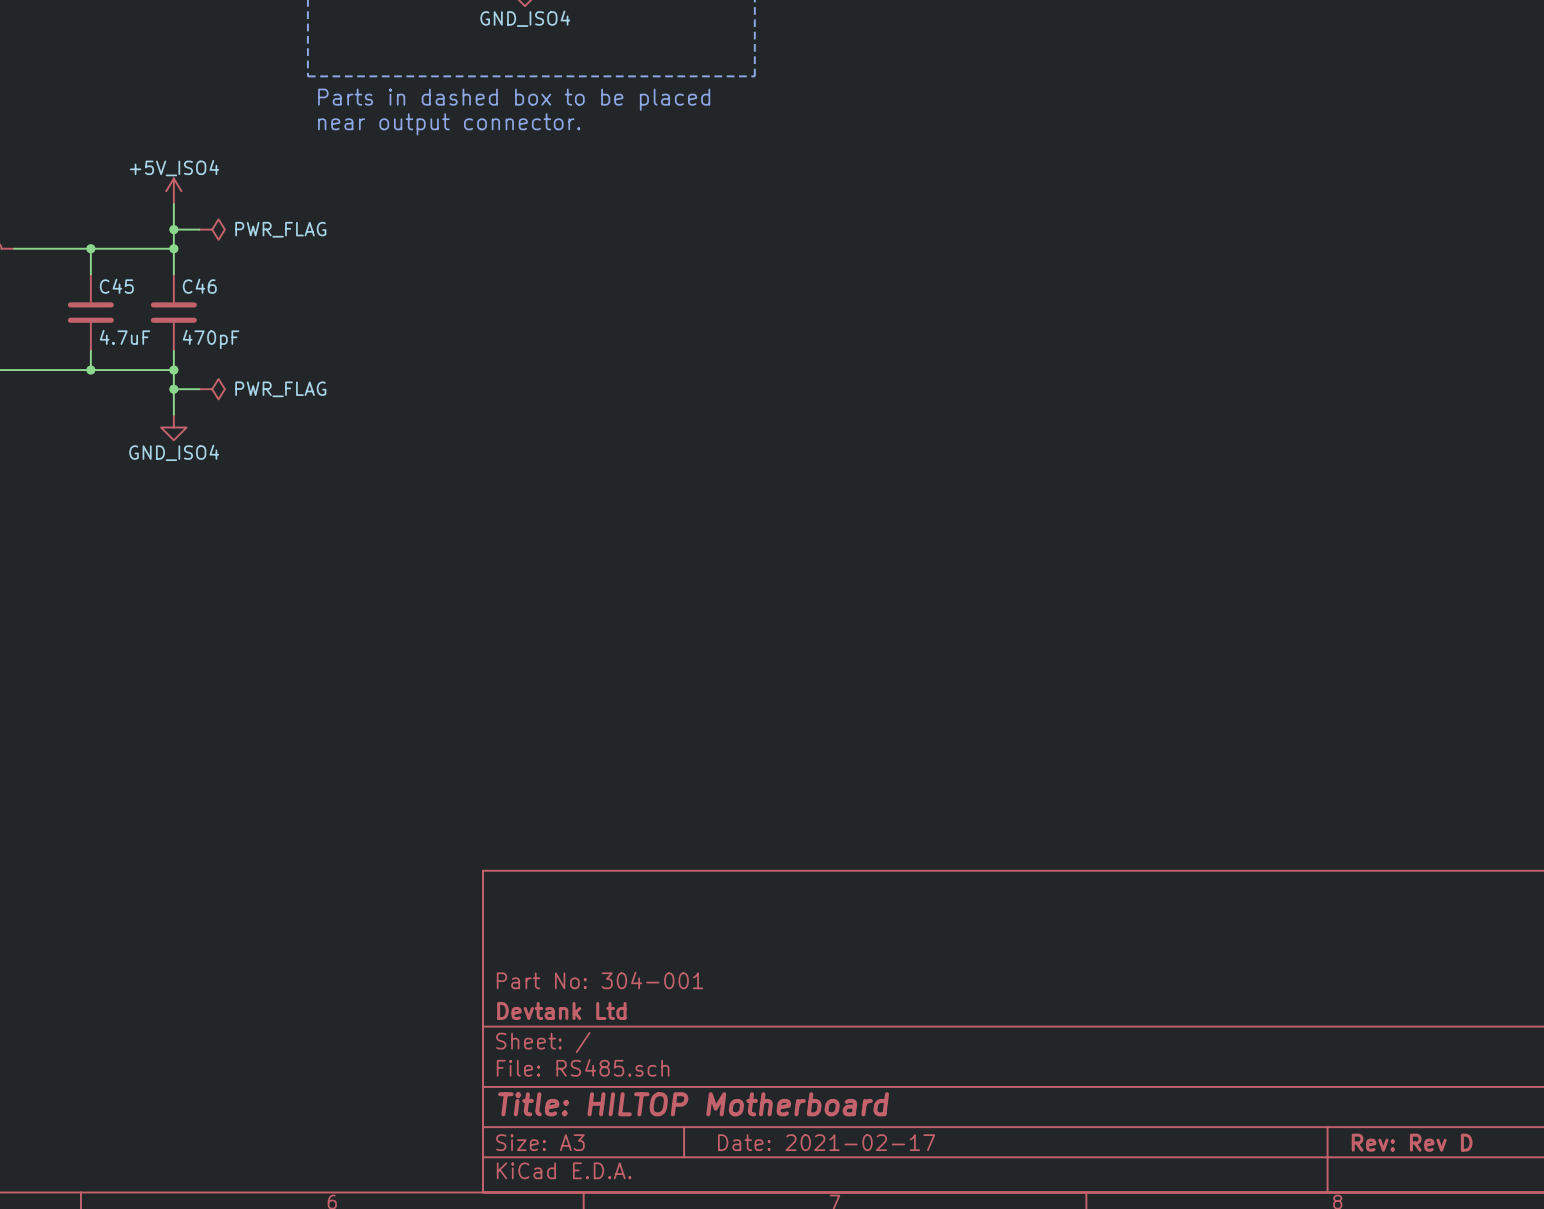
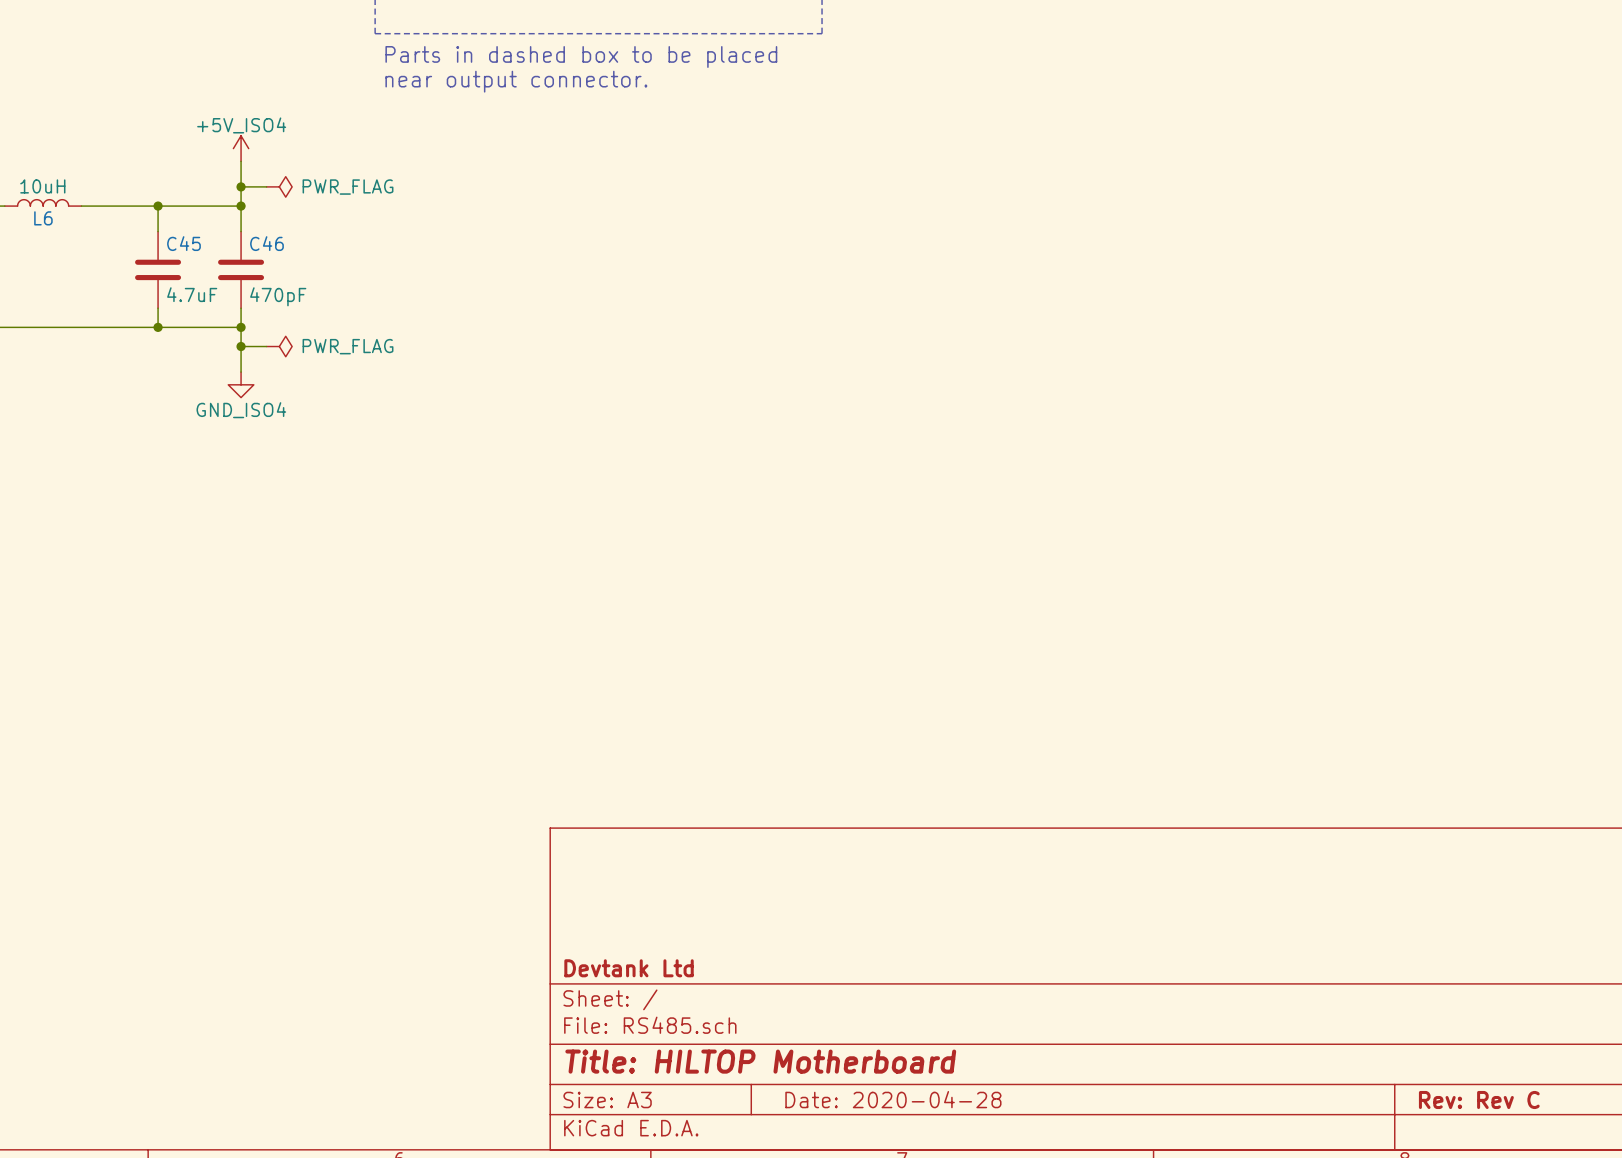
title block: Part No: 304-001 (600, 980) -> none
title block: Date: 2021-02-17 (826, 1142) -> Date: 2020-04-28 (893, 1099)
title block: Rev: Rev D (1412, 1142) -> Rev: Rev C (1479, 1099)

